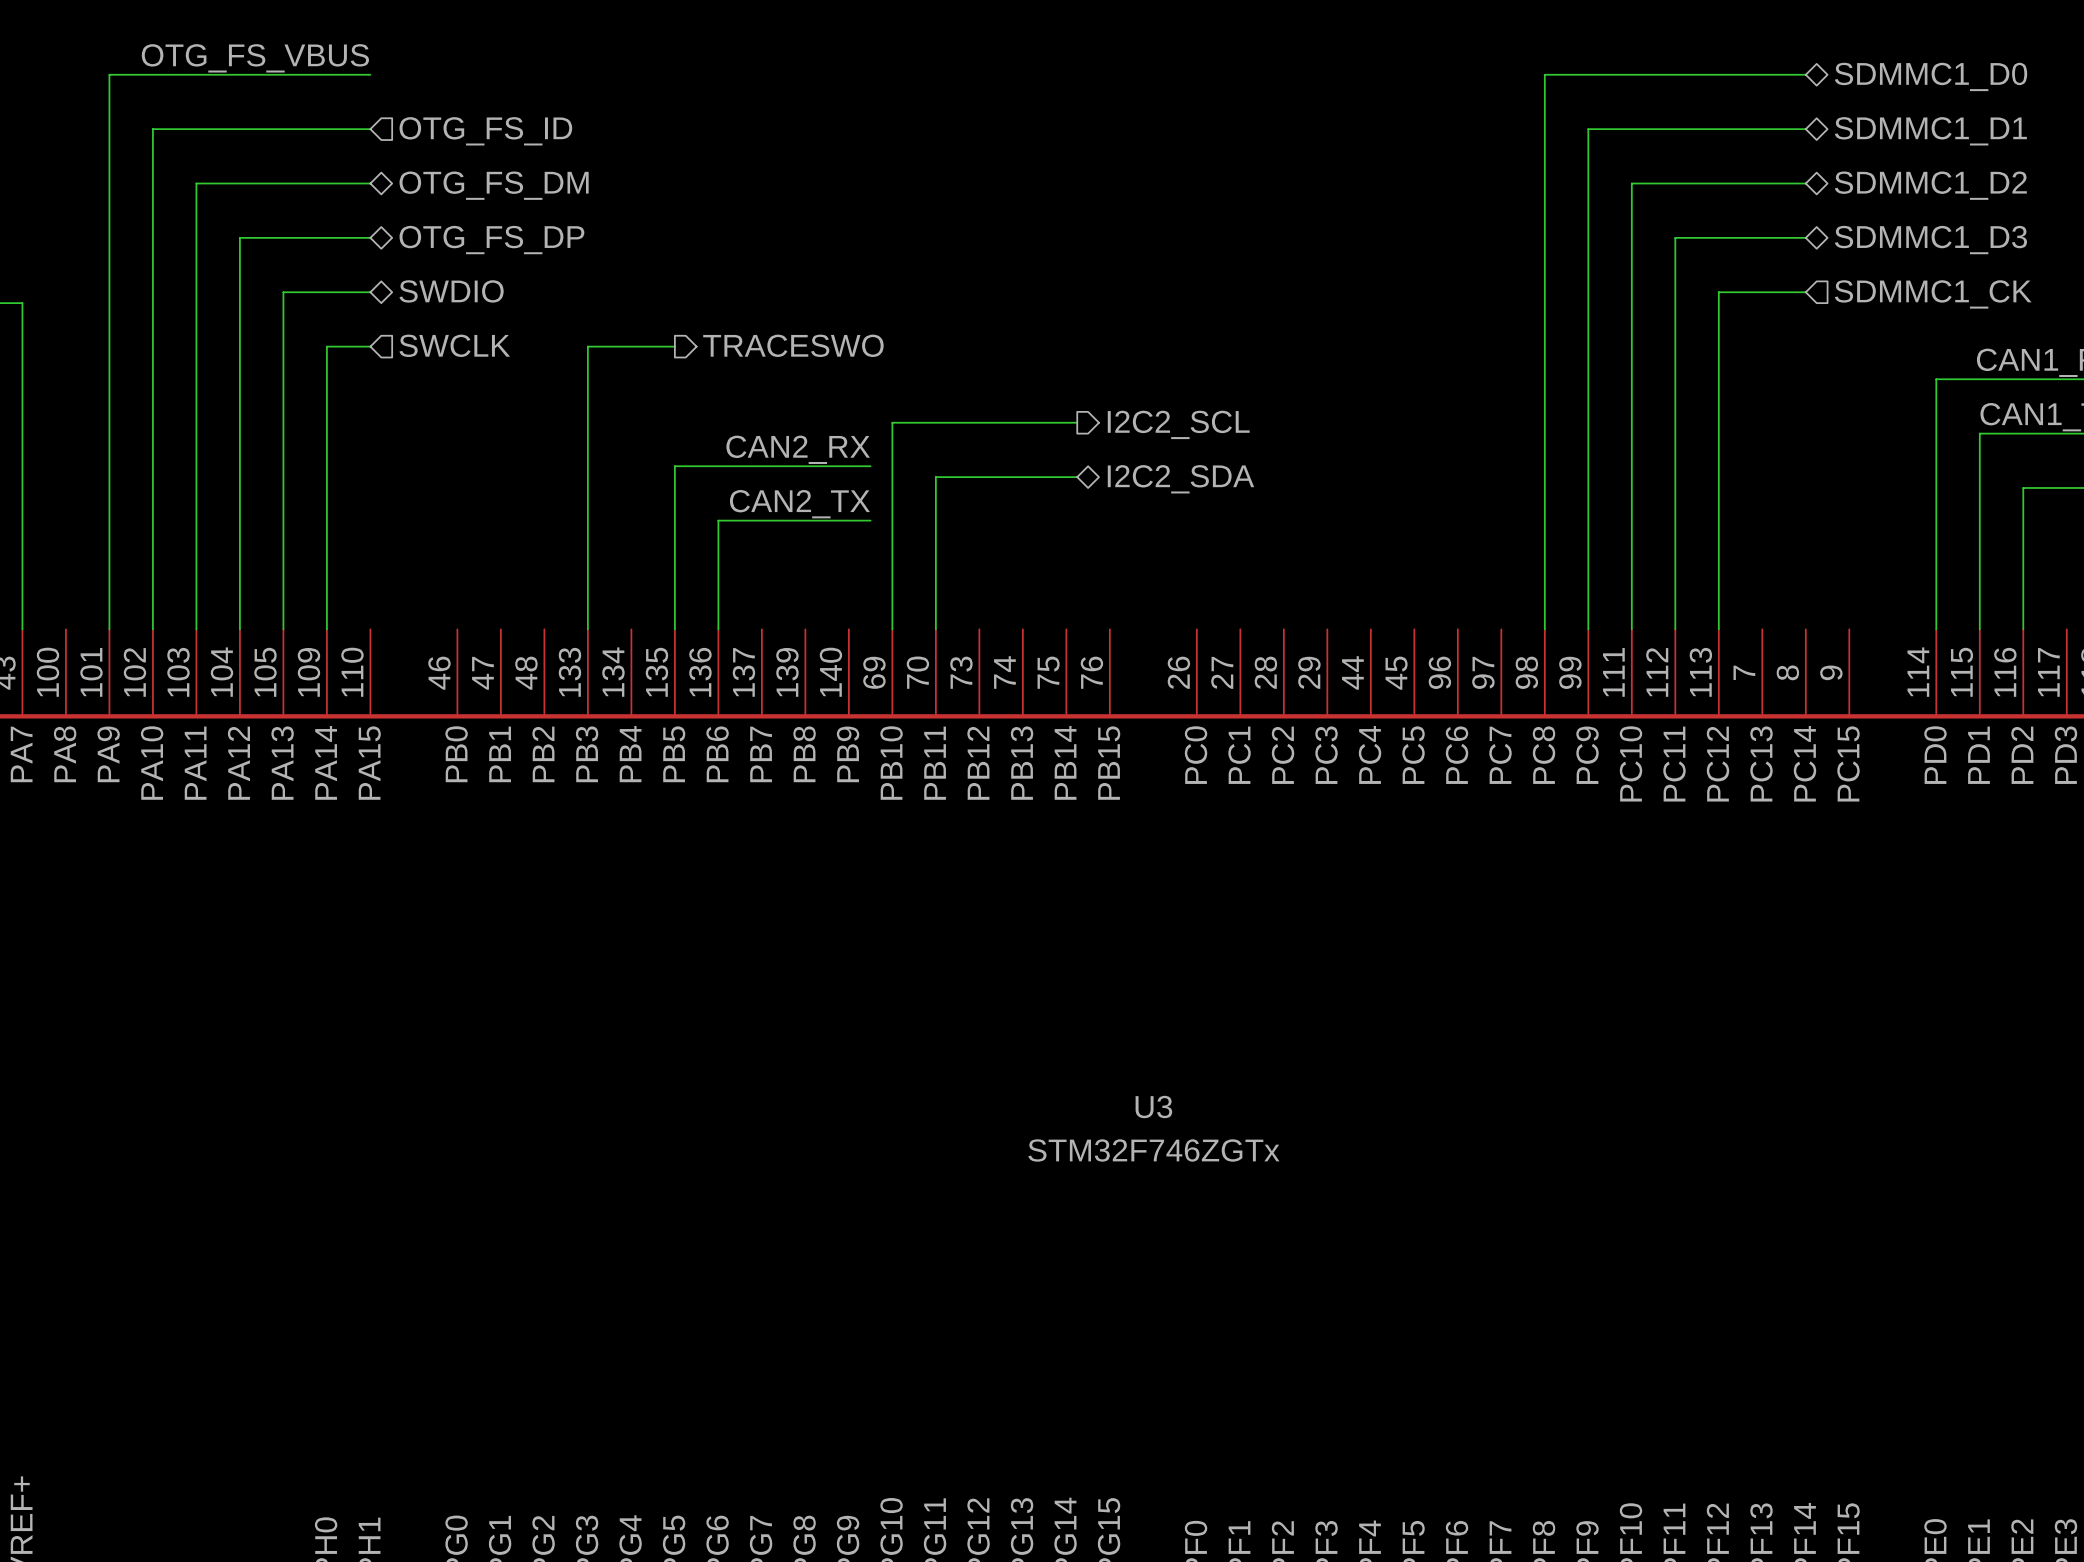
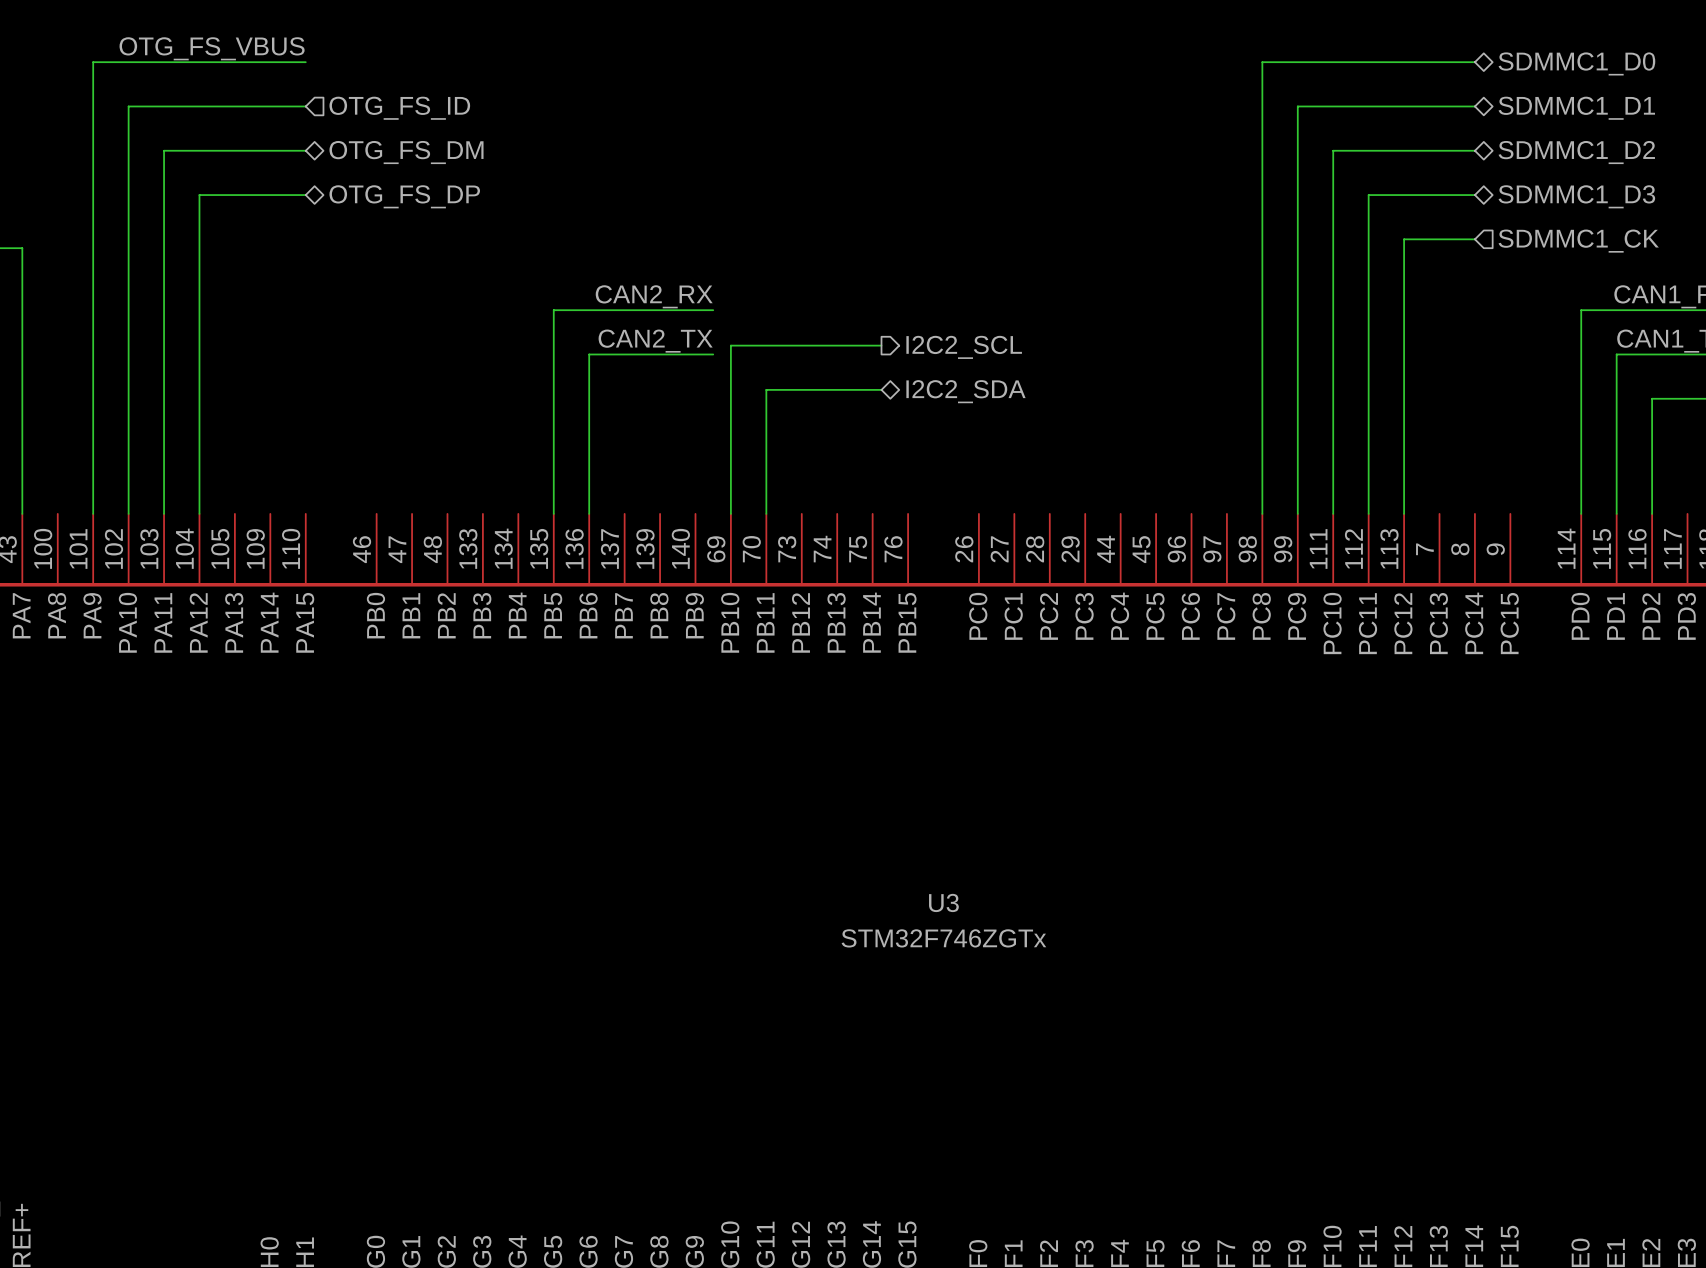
hierarchical label: SWDIO (451, 291) -> none
wire: (370, 292) (283, 292) (283, 629) -> none
hierarchical label: SWCLK (454, 345) -> none
hierarchical label: TRACESWO (793, 345) -> none
wire: (370, 346) (326, 346) (326, 629) -> none
wire: (674, 346) (587, 346) (587, 629) -> none
label position: CAN2_RX (798, 449) -> CAN2_RX (654, 296)
wire: (674, 466) (870, 466) -> (553, 381) (553, 310) (713, 310)
label position: CAN2_TX (799, 504) -> CAN2_TX (655, 341)
wire: (718, 520) (870, 520) -> (589, 425) (589, 354) (713, 354)

